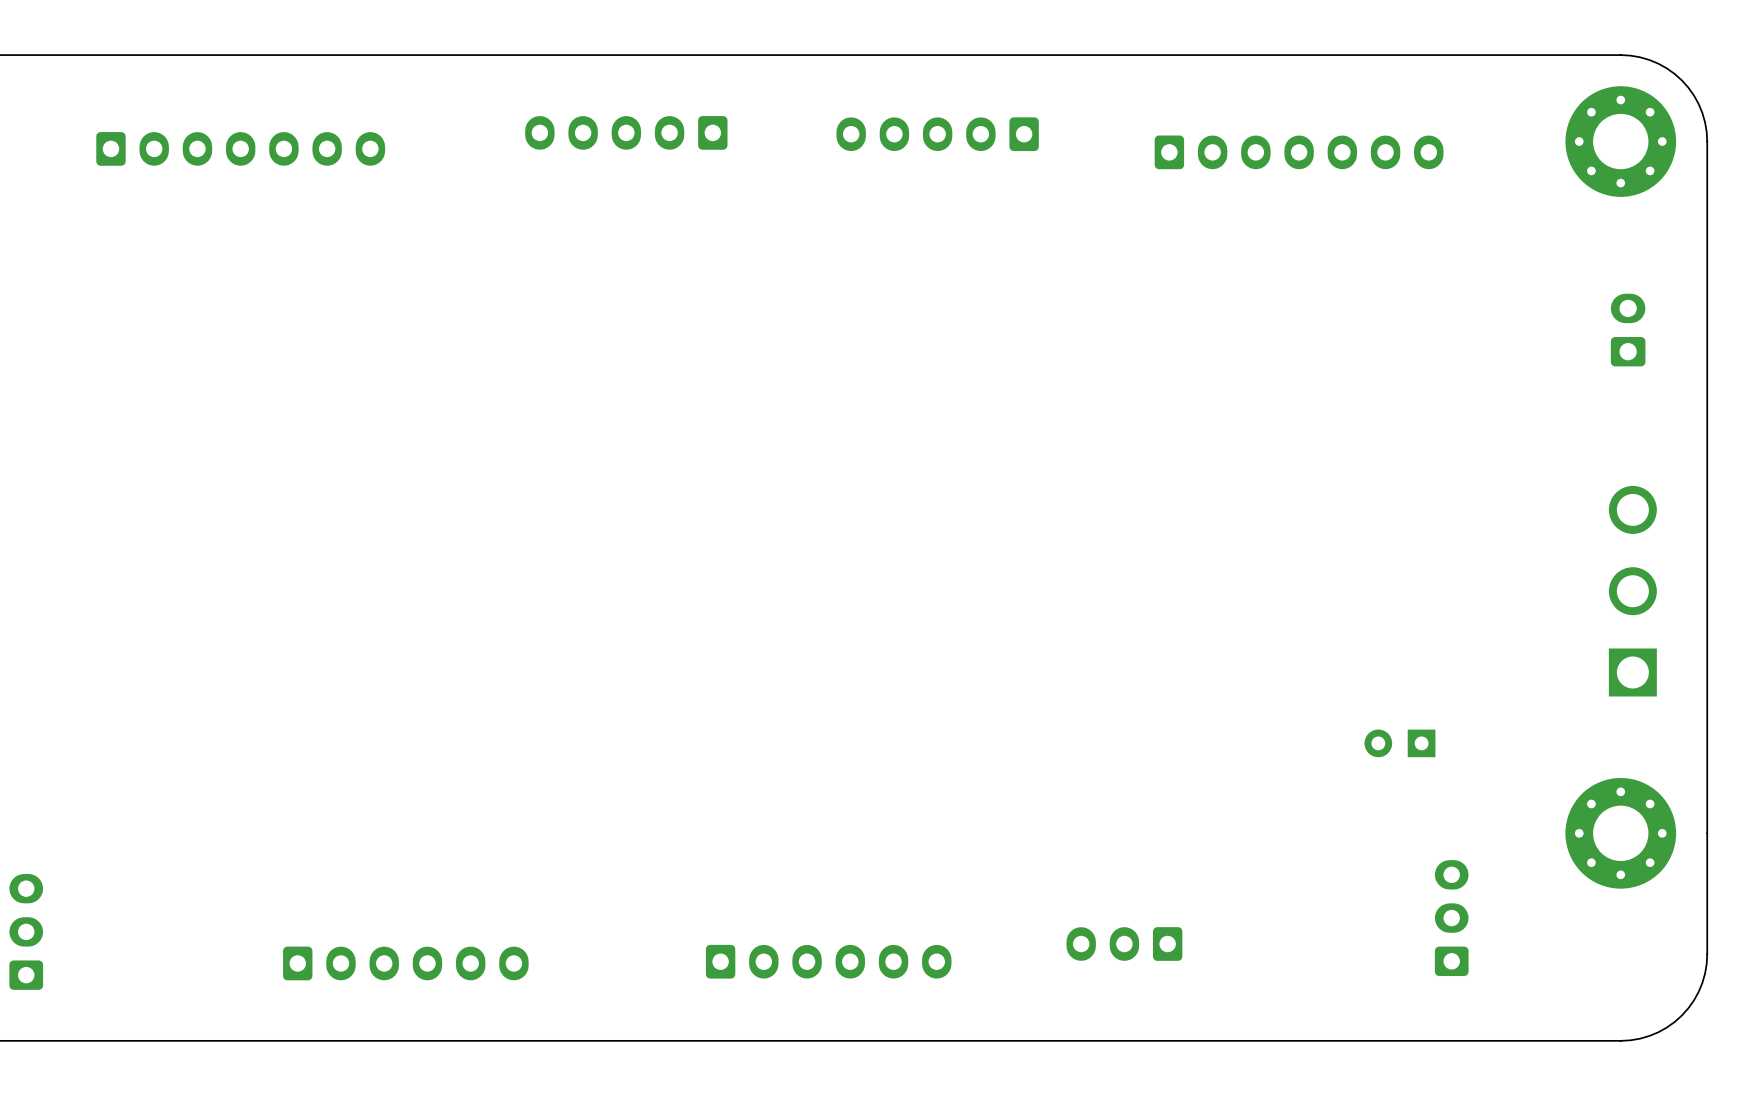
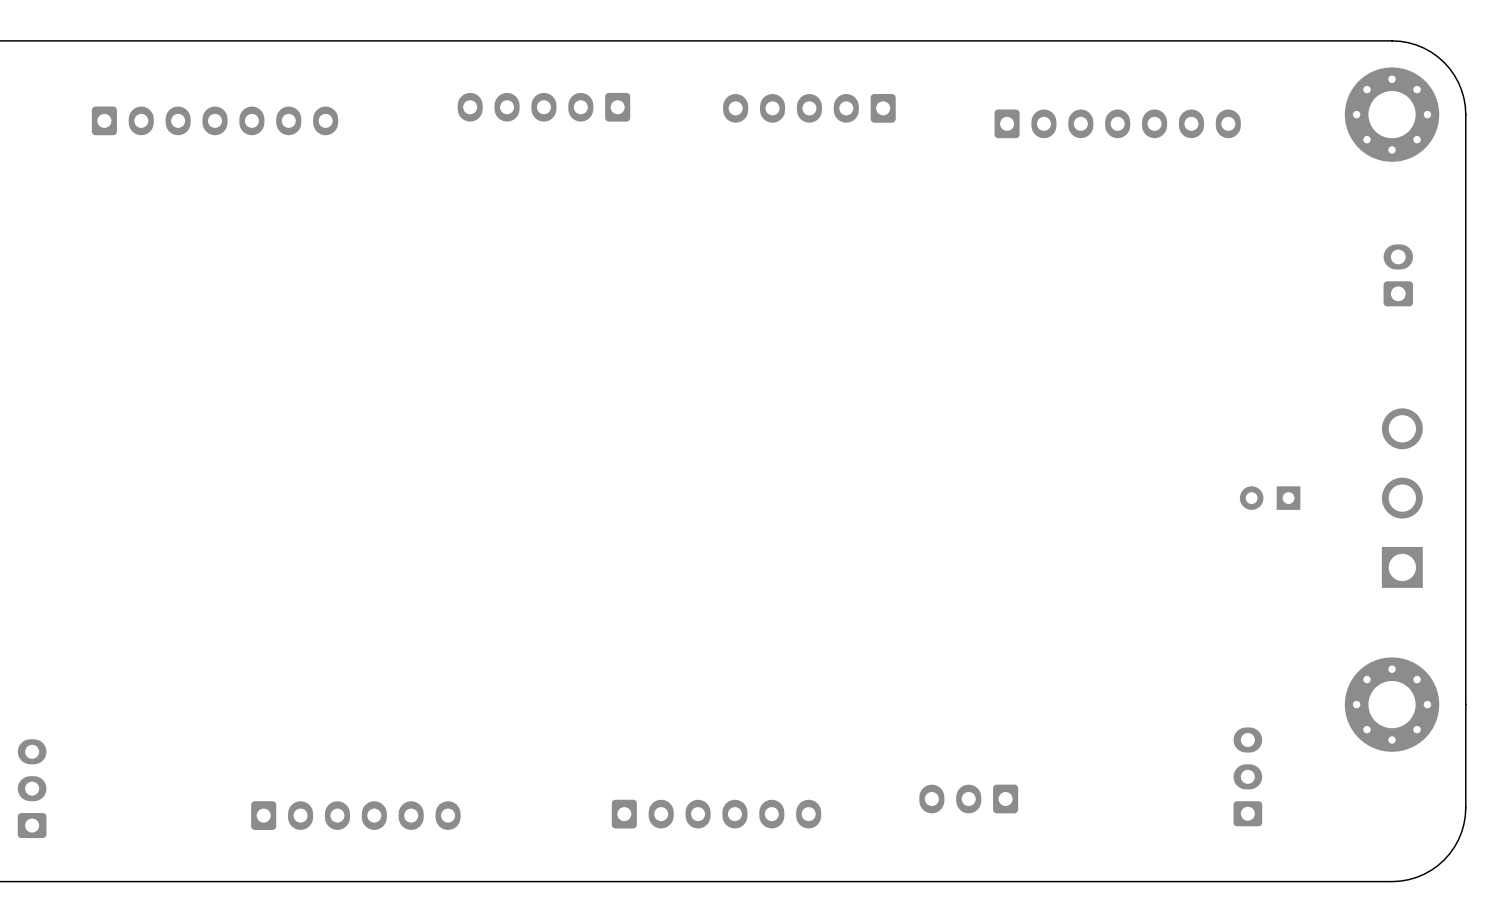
part position: (1399, 743) -> (1270, 498)

